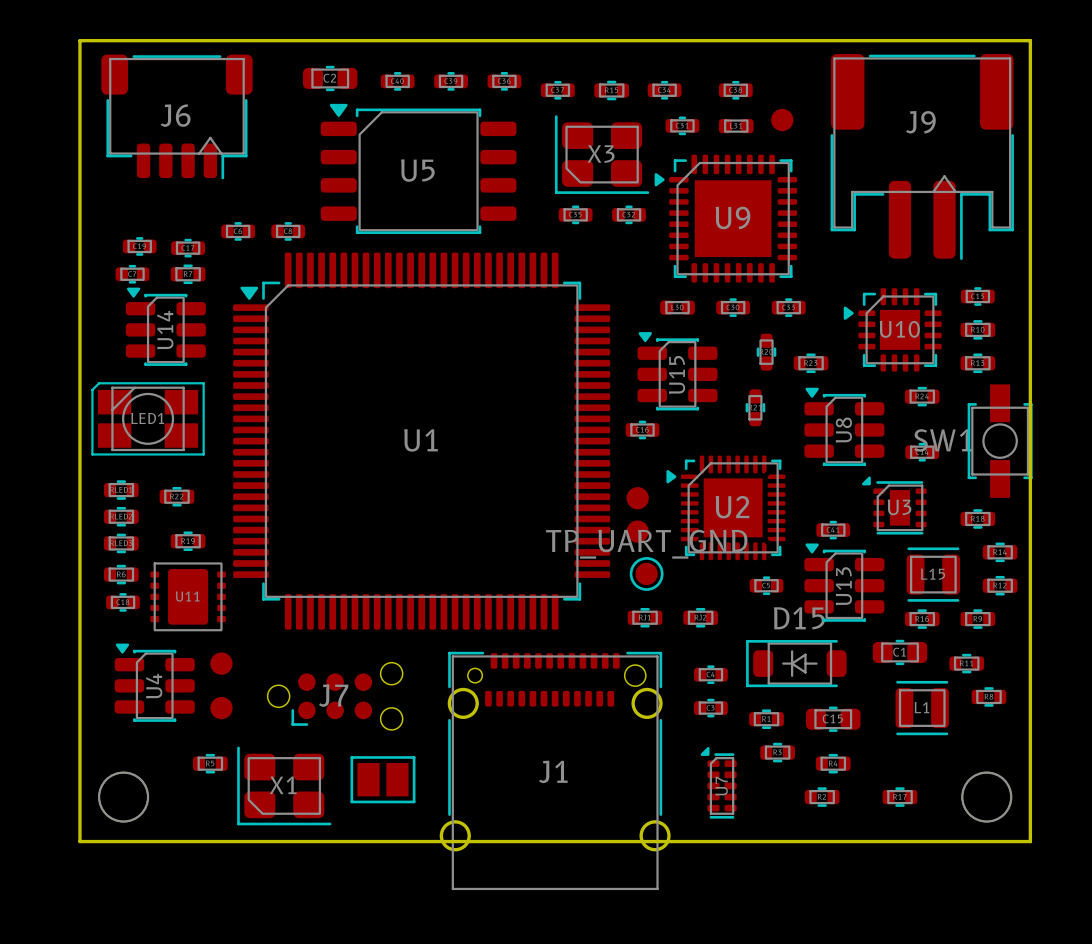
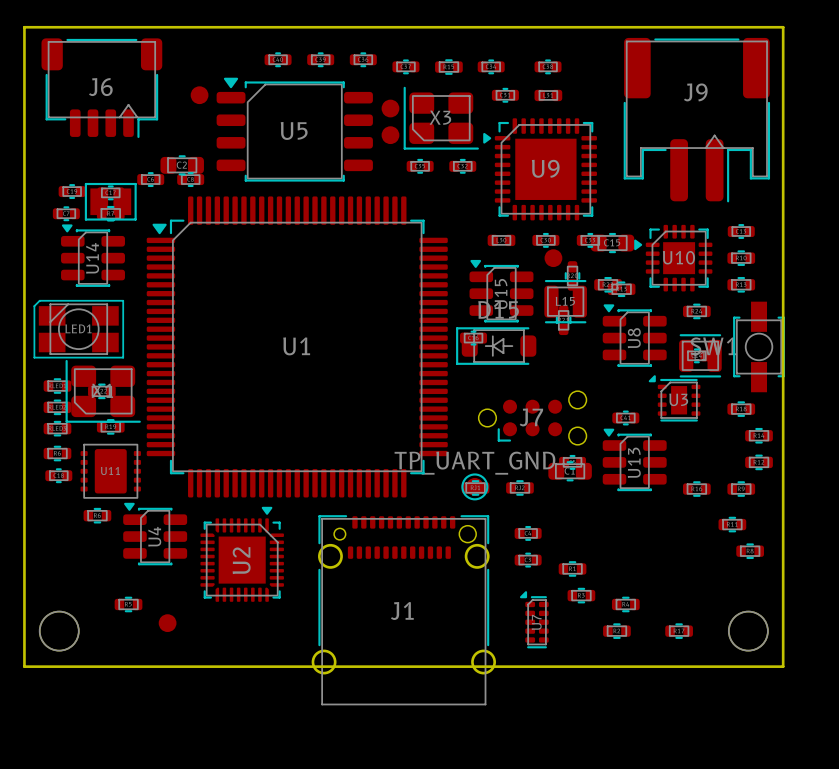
C2 position: (330, 78) -> (182, 165)
part: (782, 120) -> none
part: none -> (199, 95)
part: none -> (390, 108)
part: none -> (390, 135)
part: none -> (553, 258)
part: none -> (621, 289)
part: (637, 498) -> none
U2 rotation: 0° (725, 507) -> 90° clockwise (242, 554)
U2 position: (725, 507) -> (242, 554)
part: (637, 531) -> none
TP_UART_GND position: (646, 573) -> (474, 486)
L15 position: (933, 574) -> (565, 301)
part: none -> (97, 515)
C1 position: (900, 652) -> (570, 471)
part: (221, 663) -> none
D15 position: (796, 663) -> (496, 346)
U4 position: (154, 682) -> (155, 534)
J7 position: (335, 696) -> (532, 417)
part: (221, 708) -> none
L1 position: (922, 708) -> (700, 355)
C15 position: (833, 719) -> (612, 243)
part position: (382, 779) -> (110, 201)
X1 position: (284, 785) -> (103, 391)
part: none -> (167, 623)

